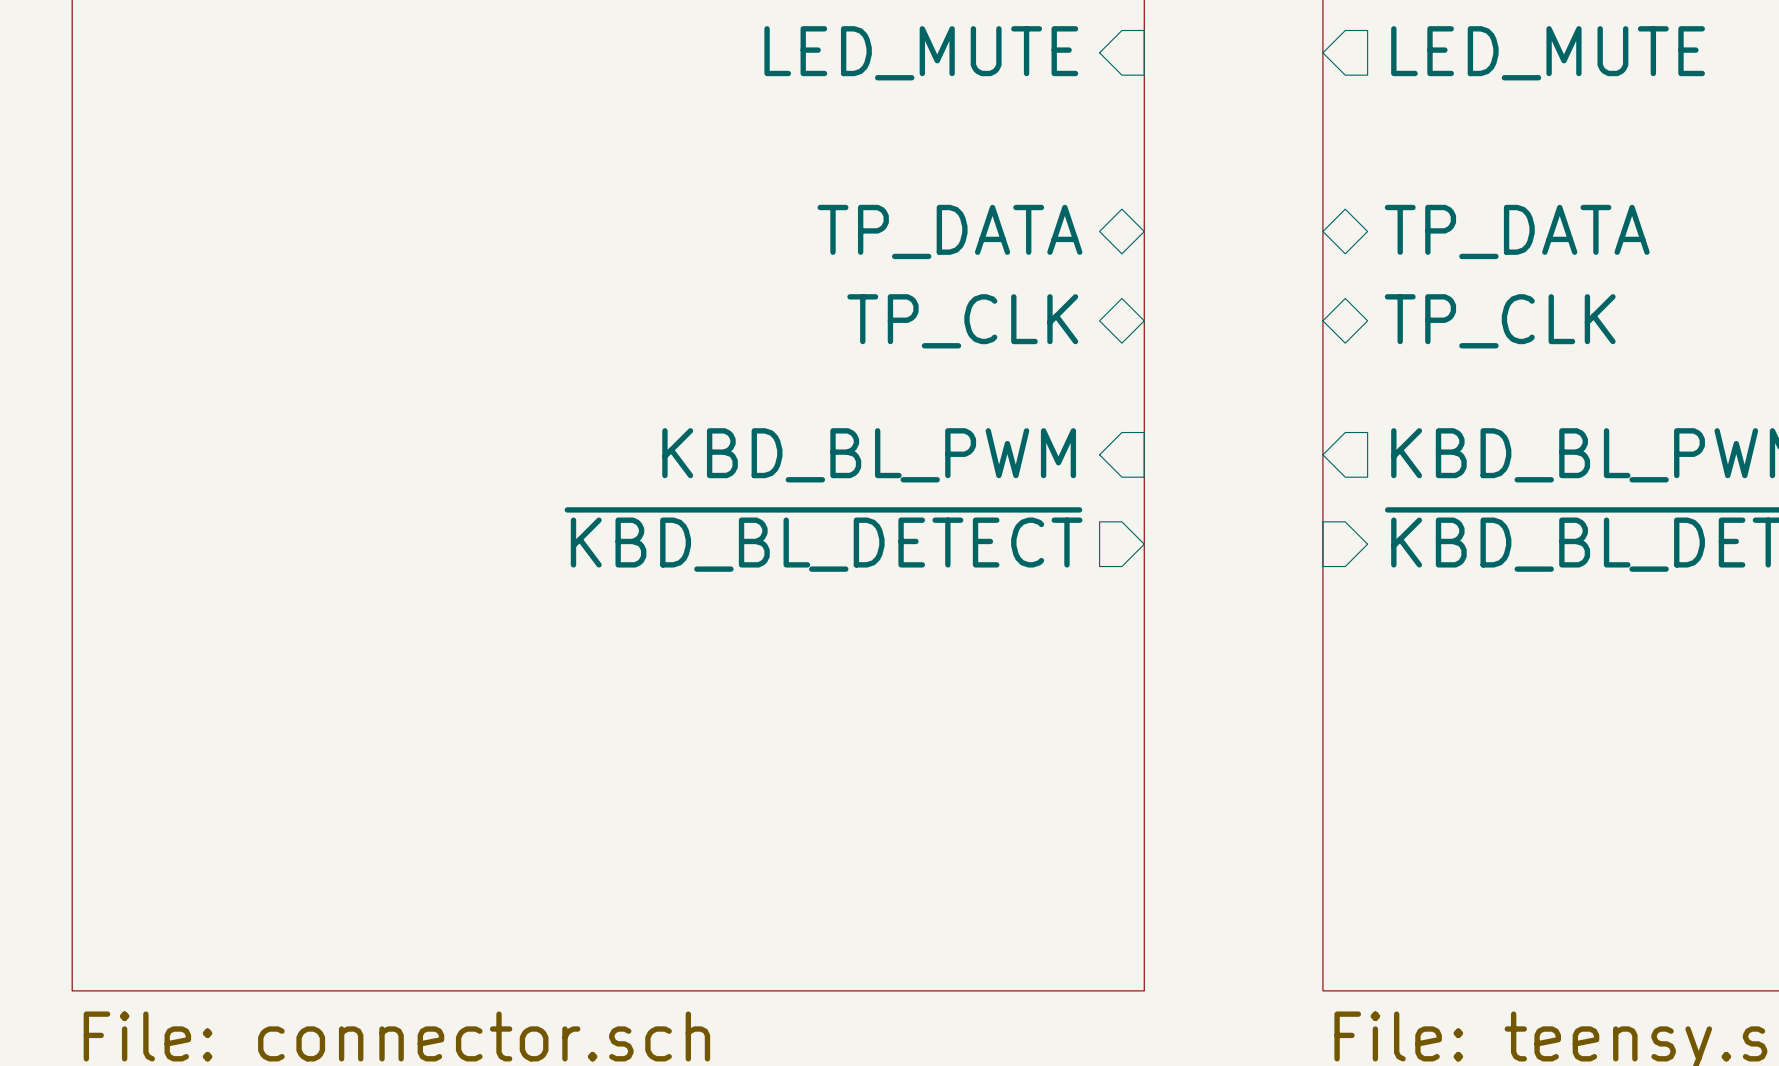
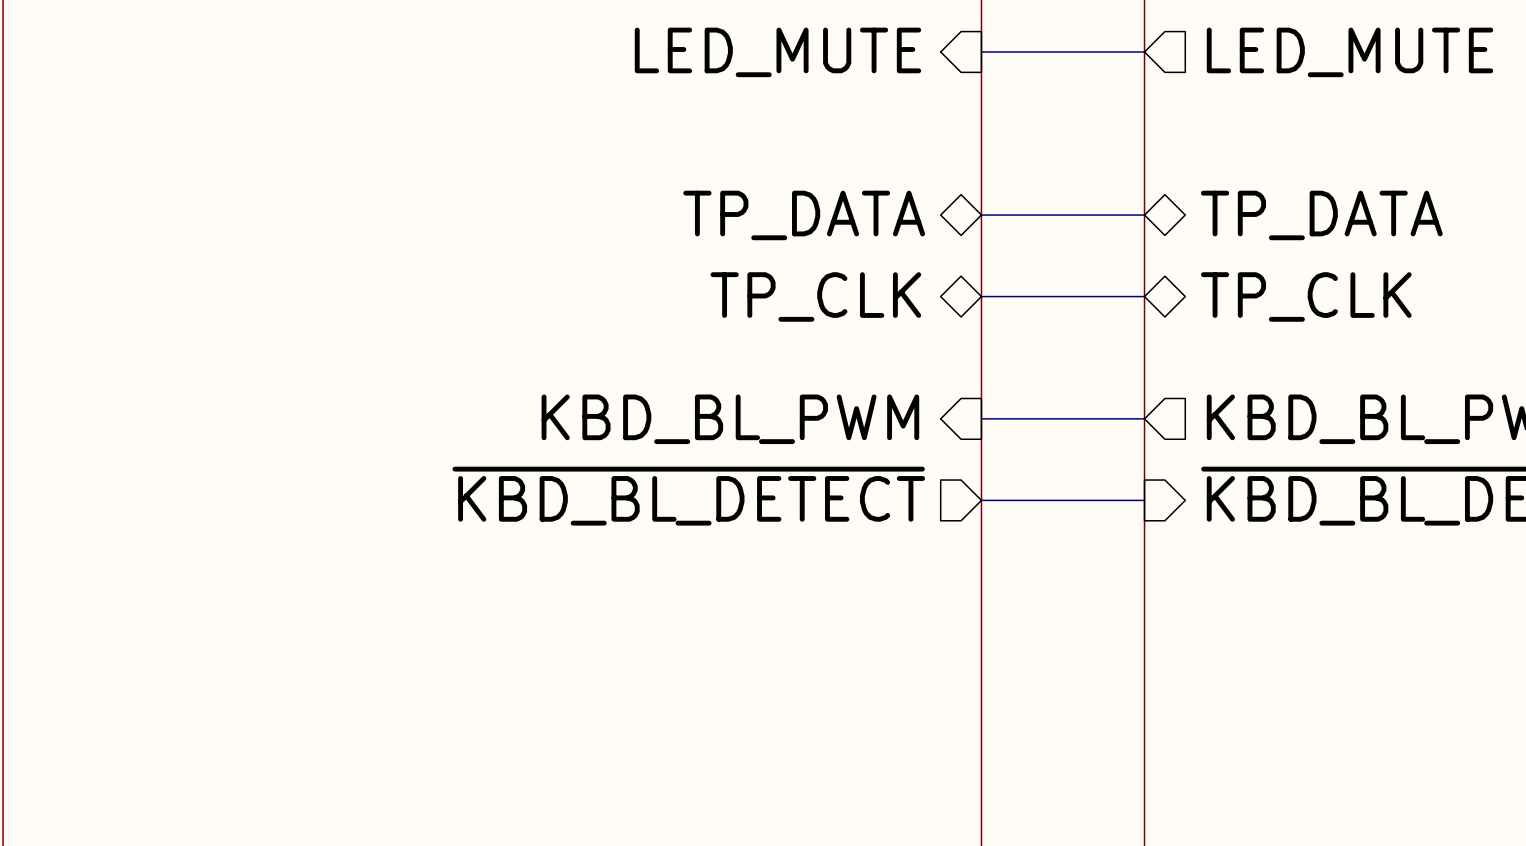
wire: none -> (981, 51) (1144, 51)
wire: none -> (981, 215) (1144, 215)
wire: none -> (981, 296) (1144, 296)
wire: none -> (981, 418) (1144, 418)
wire: none -> (981, 500) (1144, 500)

